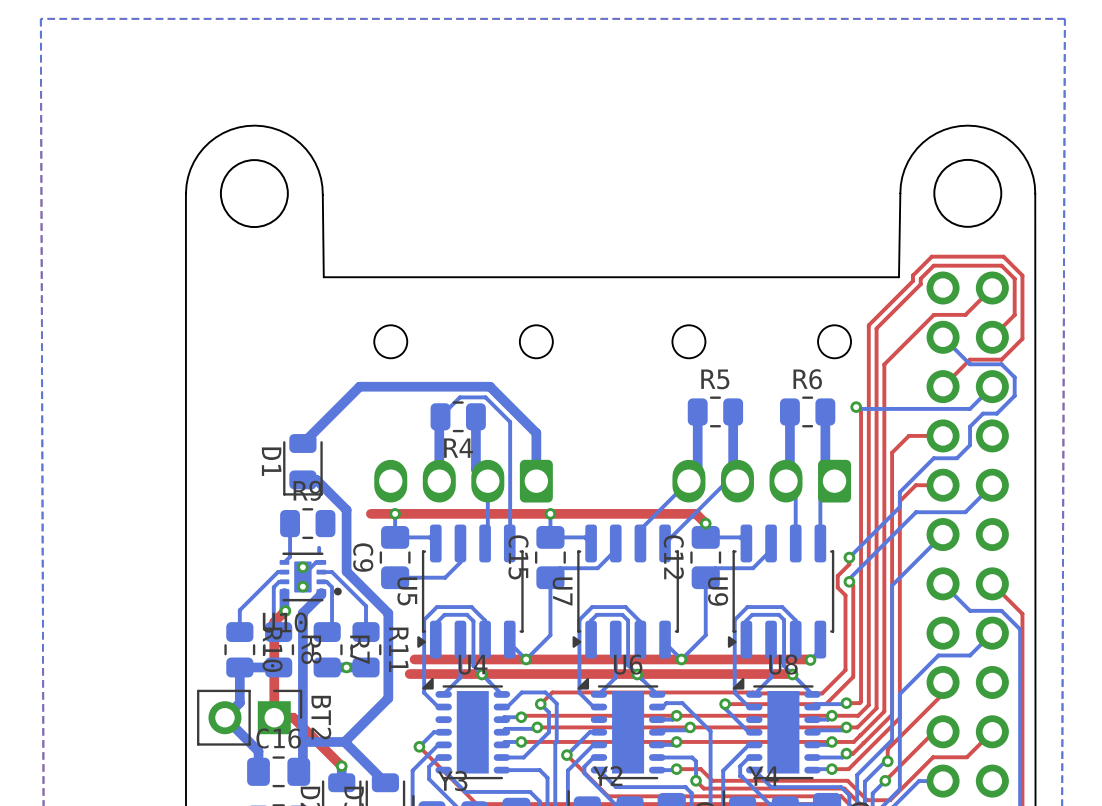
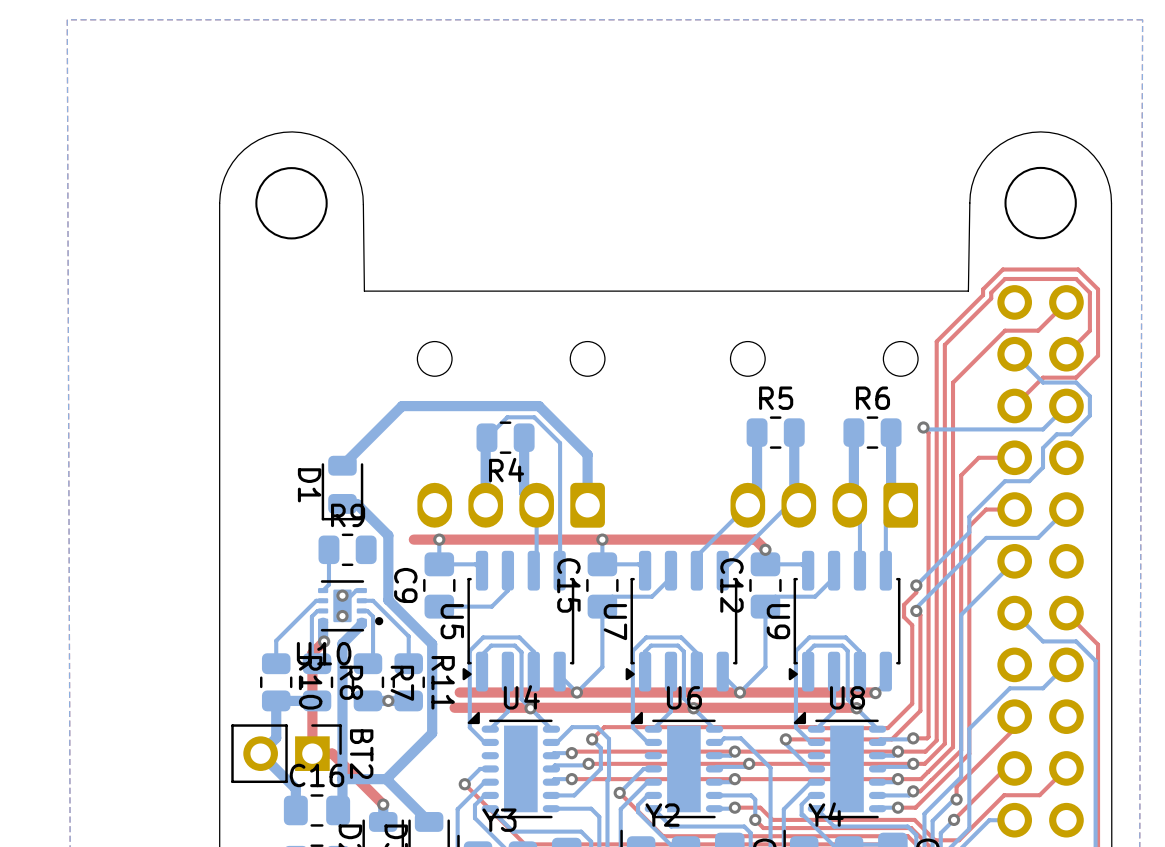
bottom track: (319, 547) (319, 551) -> none

